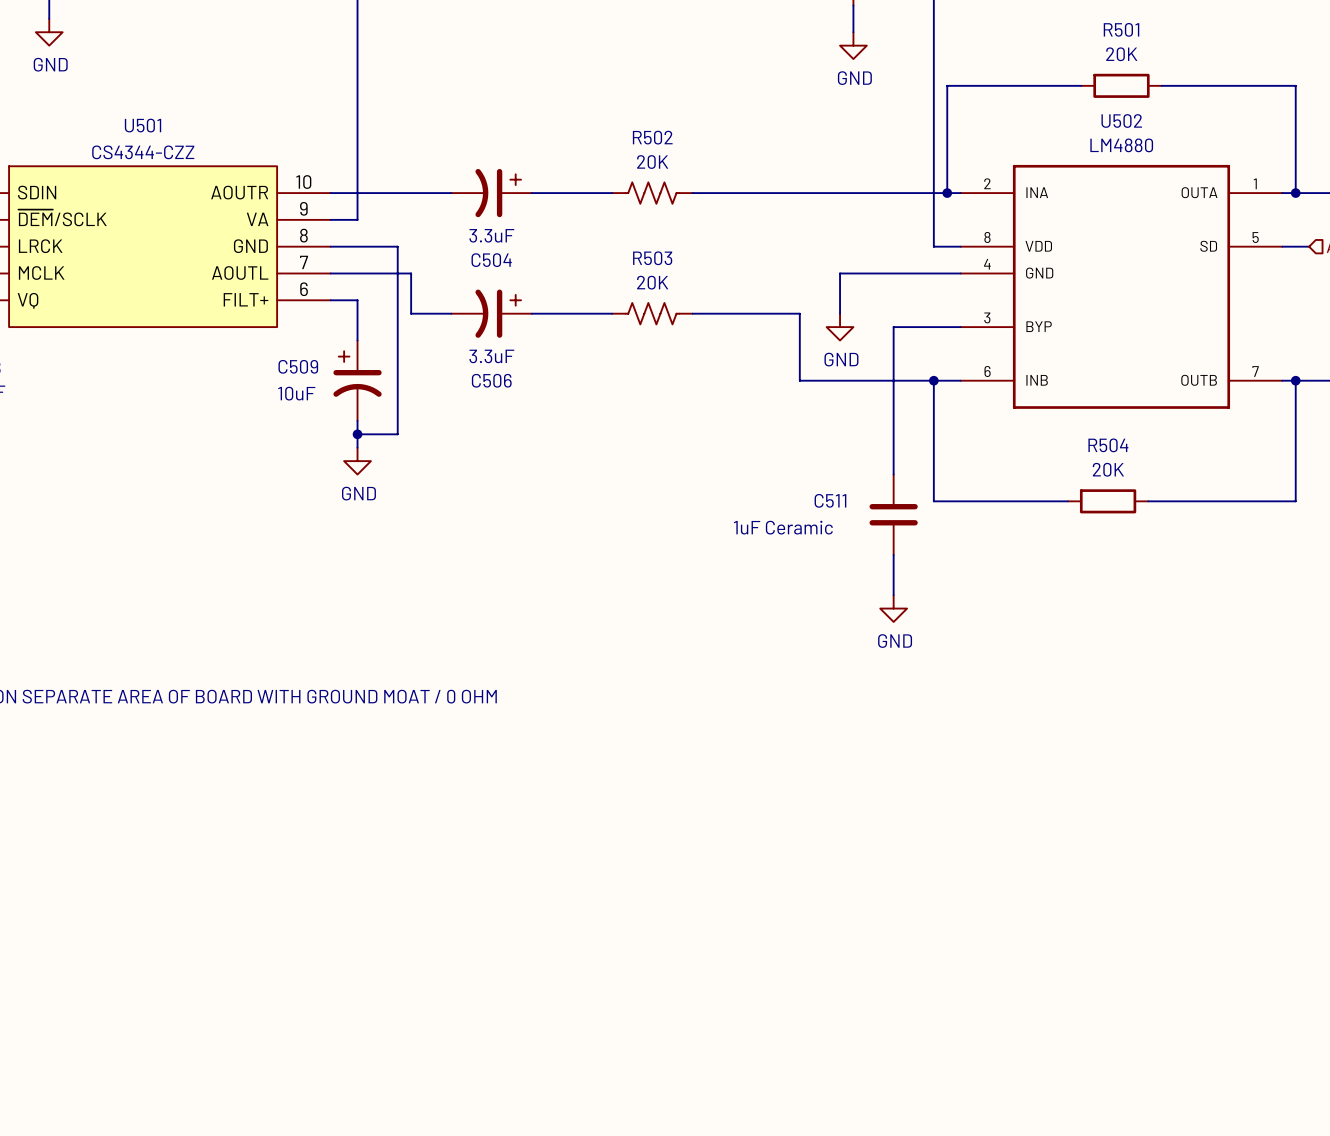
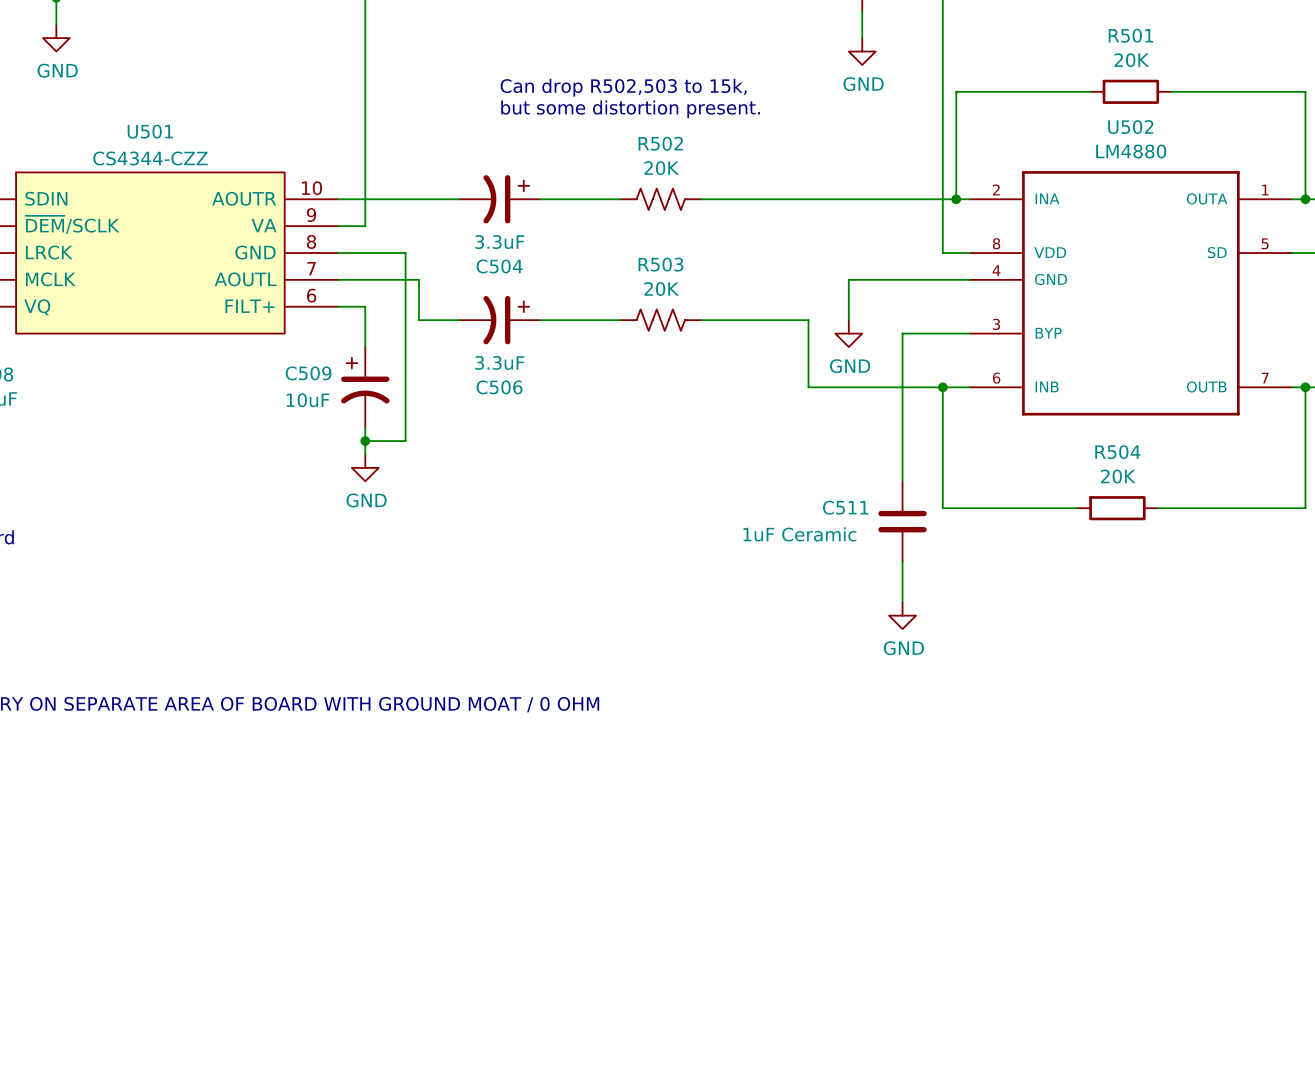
text: none -> Can drop R502,503 to 15k, (623, 87)
text: none -> but some distortion present. (630, 109)

